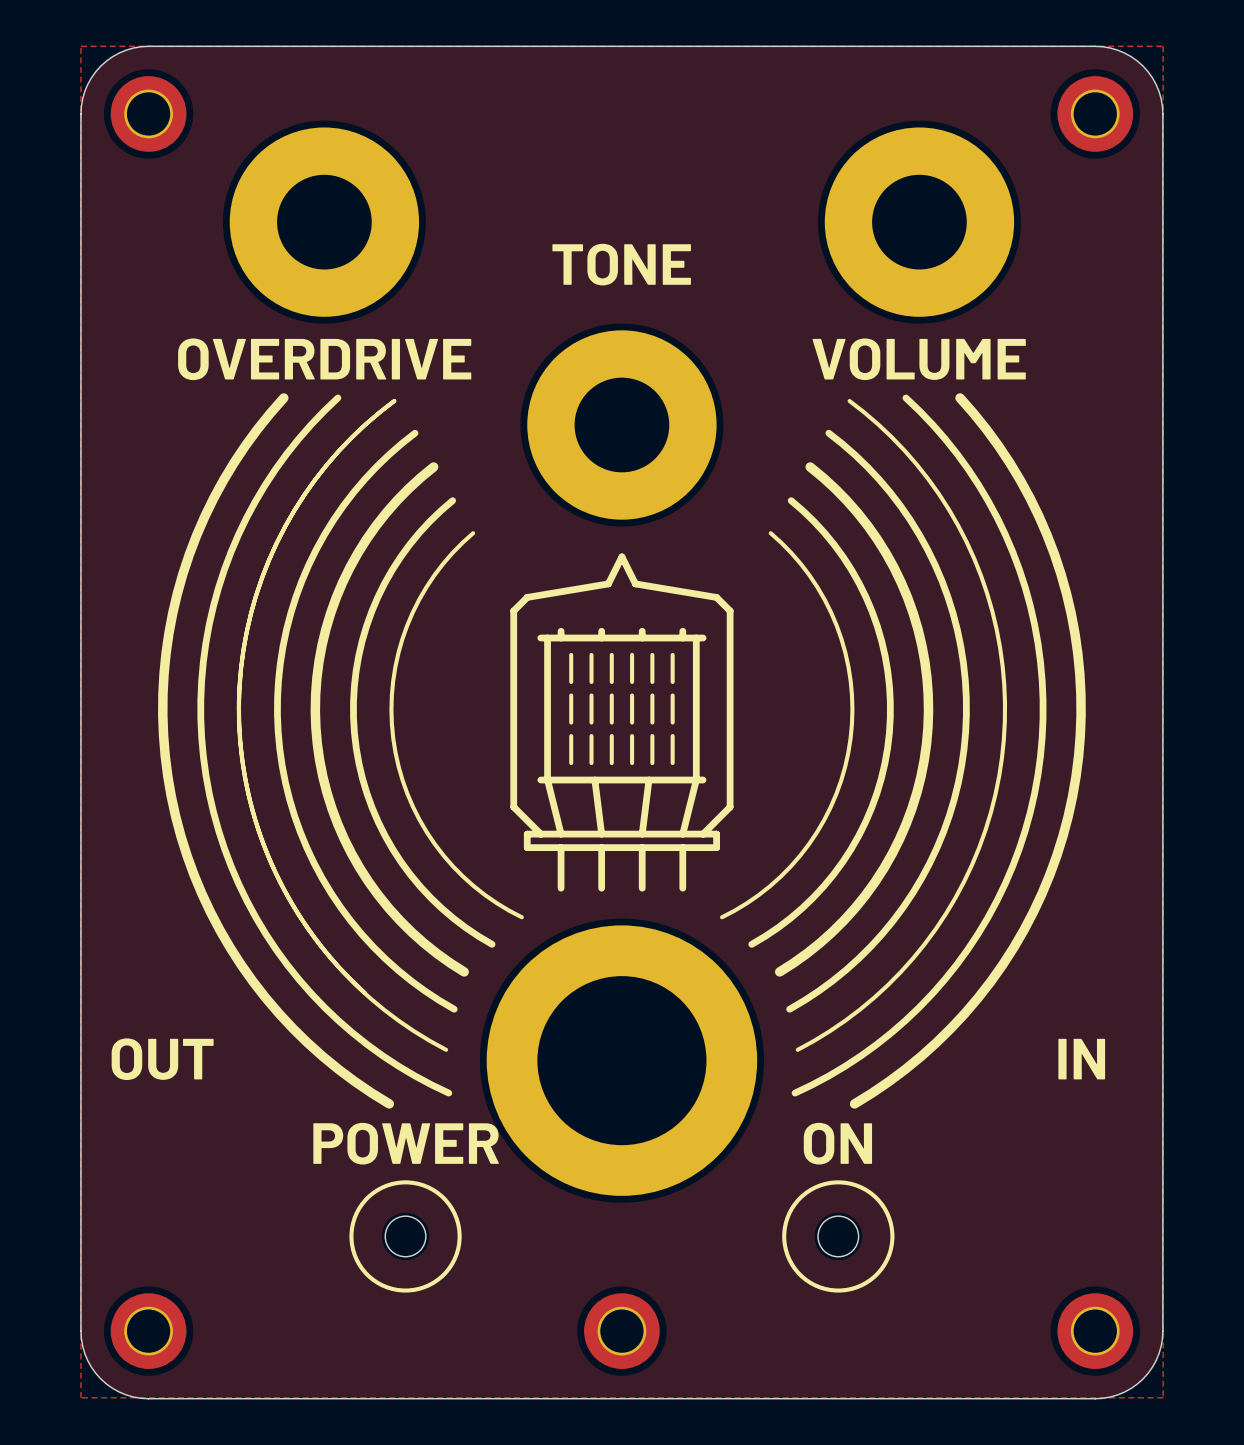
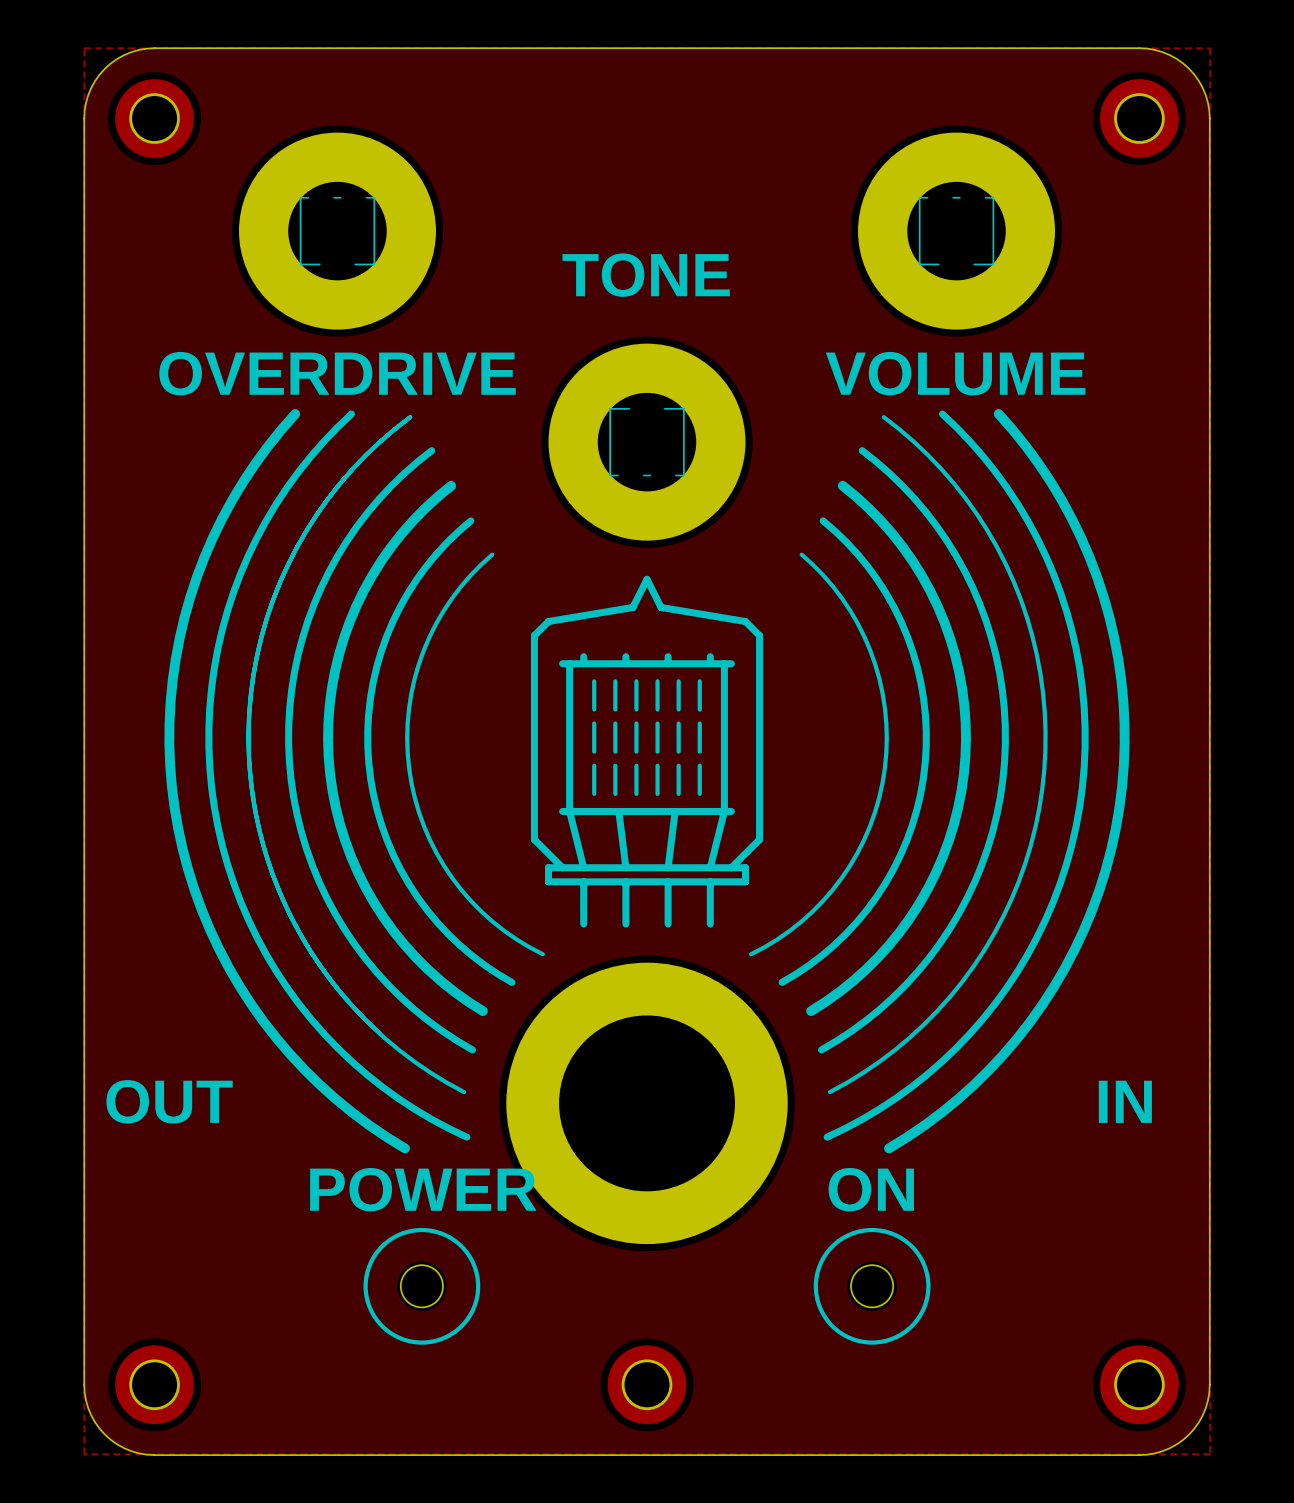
part footprint: [229, 127, 420, 317] -> [238, 132, 436, 330]
part footprint: [824, 127, 1015, 317] -> [858, 132, 1056, 330]
part footprint: [527, 330, 717, 520] -> [548, 343, 746, 541]

